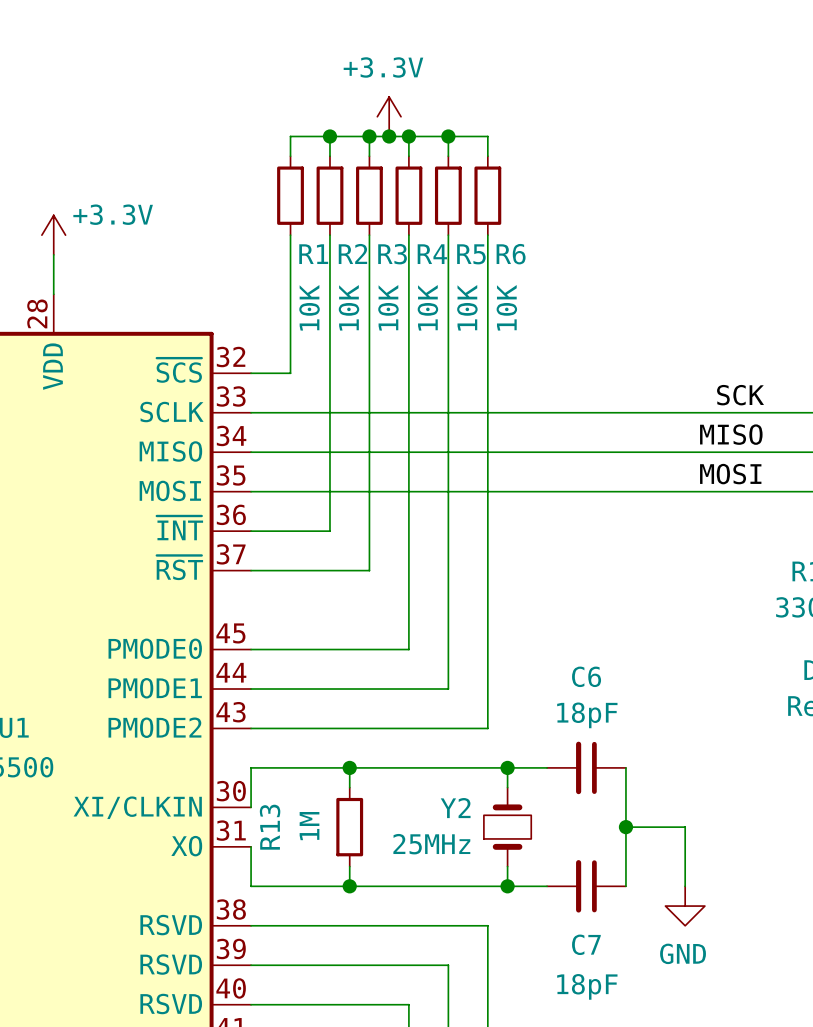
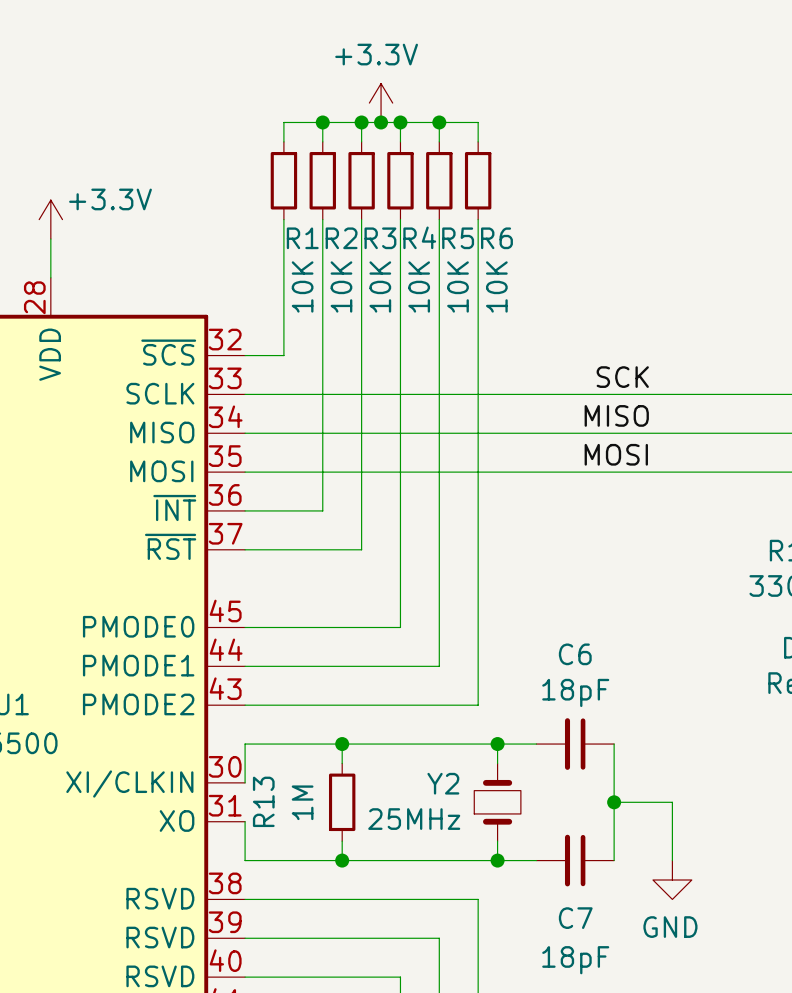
label position: SCK (740, 395) -> SCK (622, 377)
label position: MISO (731, 434) -> MISO (616, 415)
label position: MOSI (730, 474) -> MOSI (616, 454)

